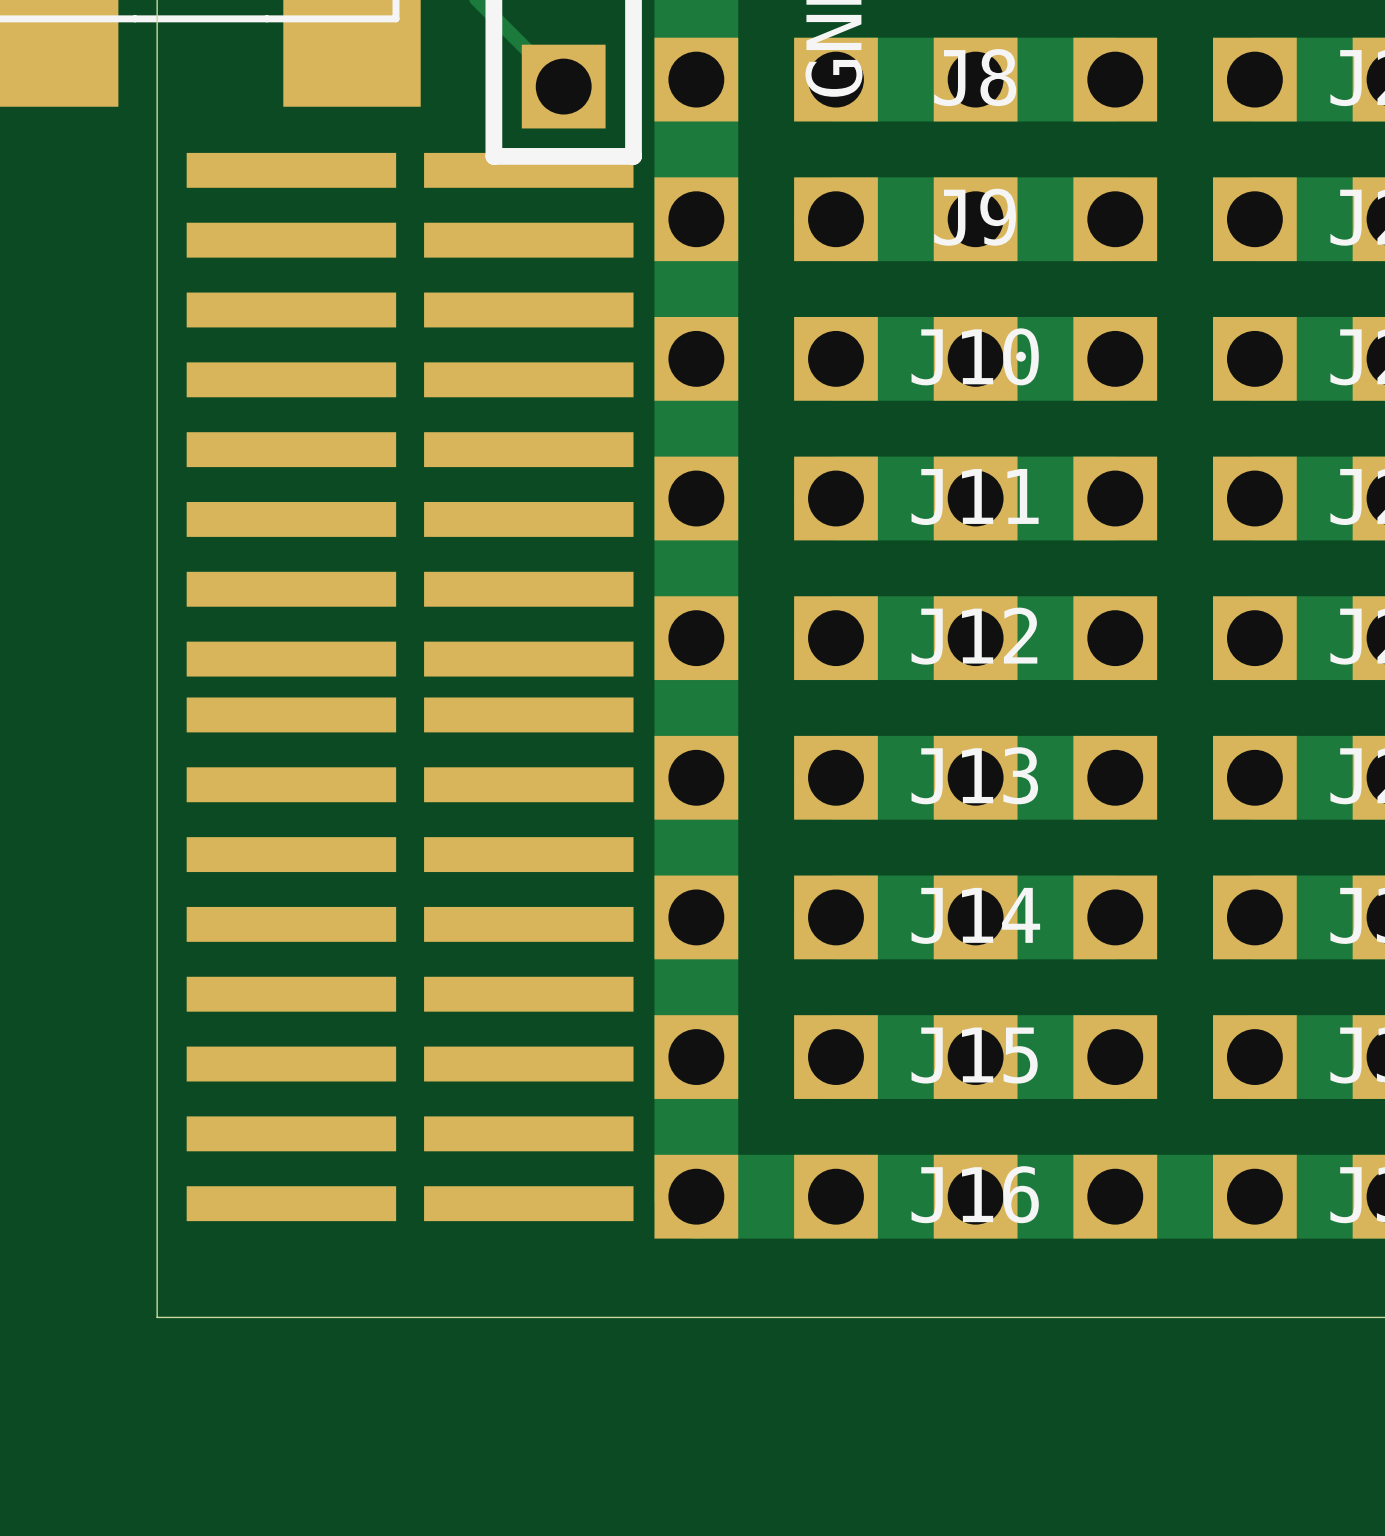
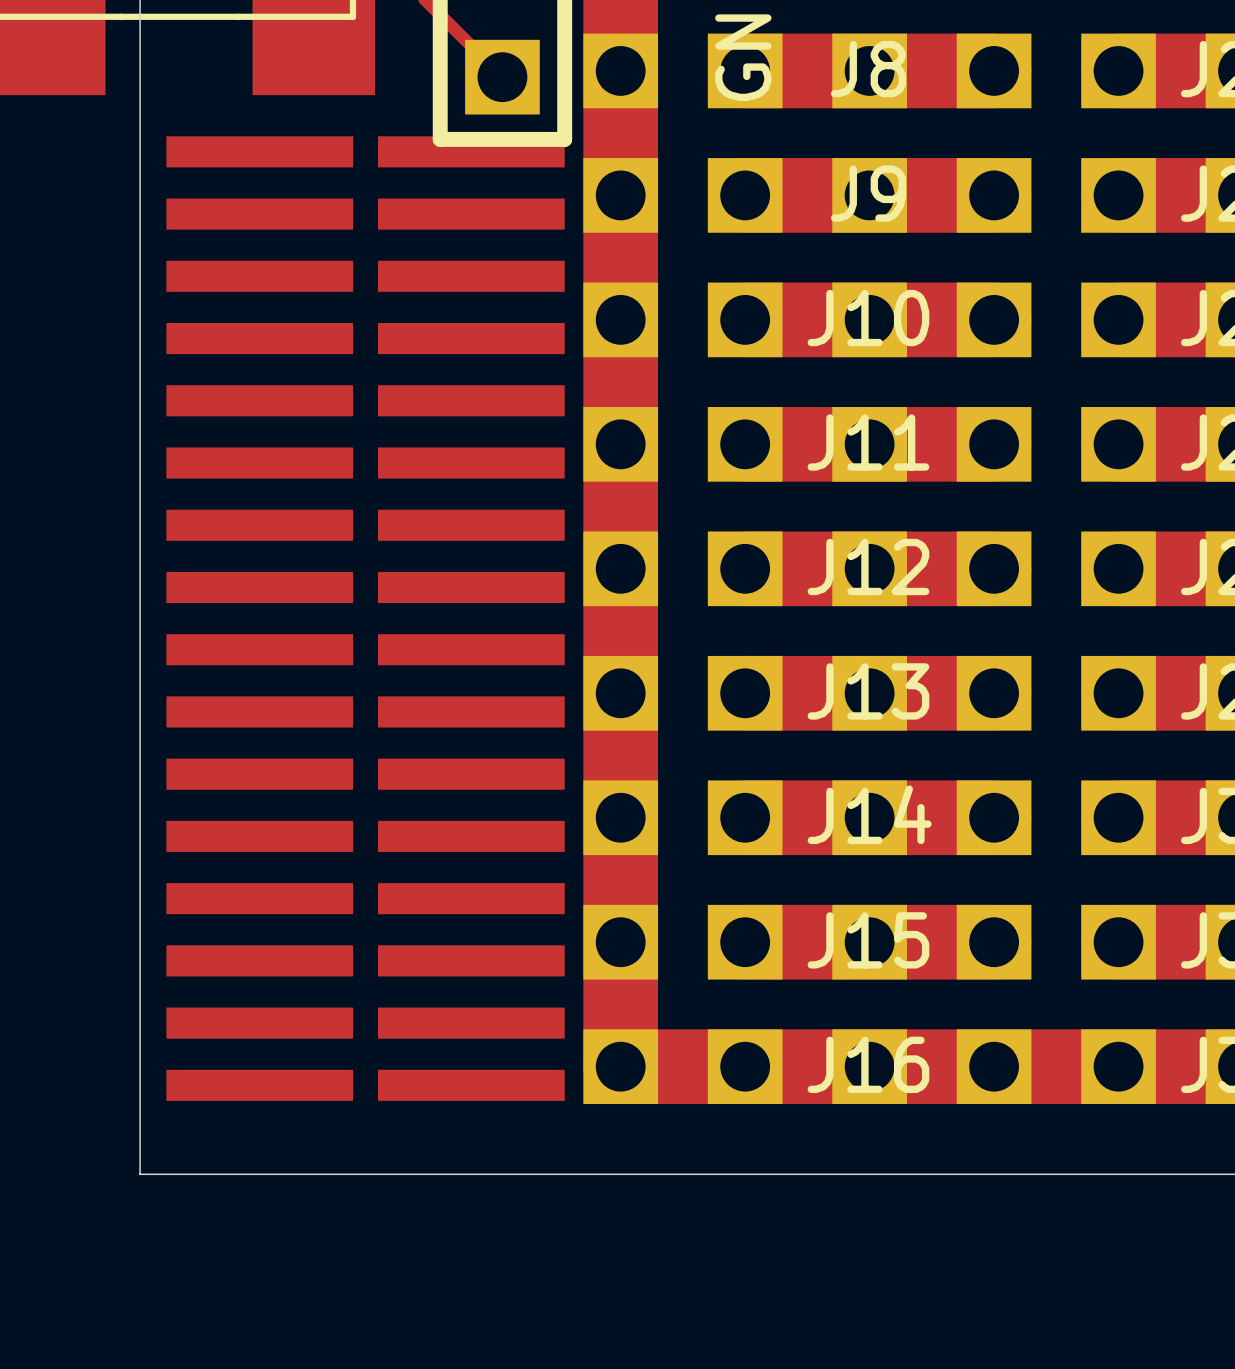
part position: (410, 959) -> (365, 867)

